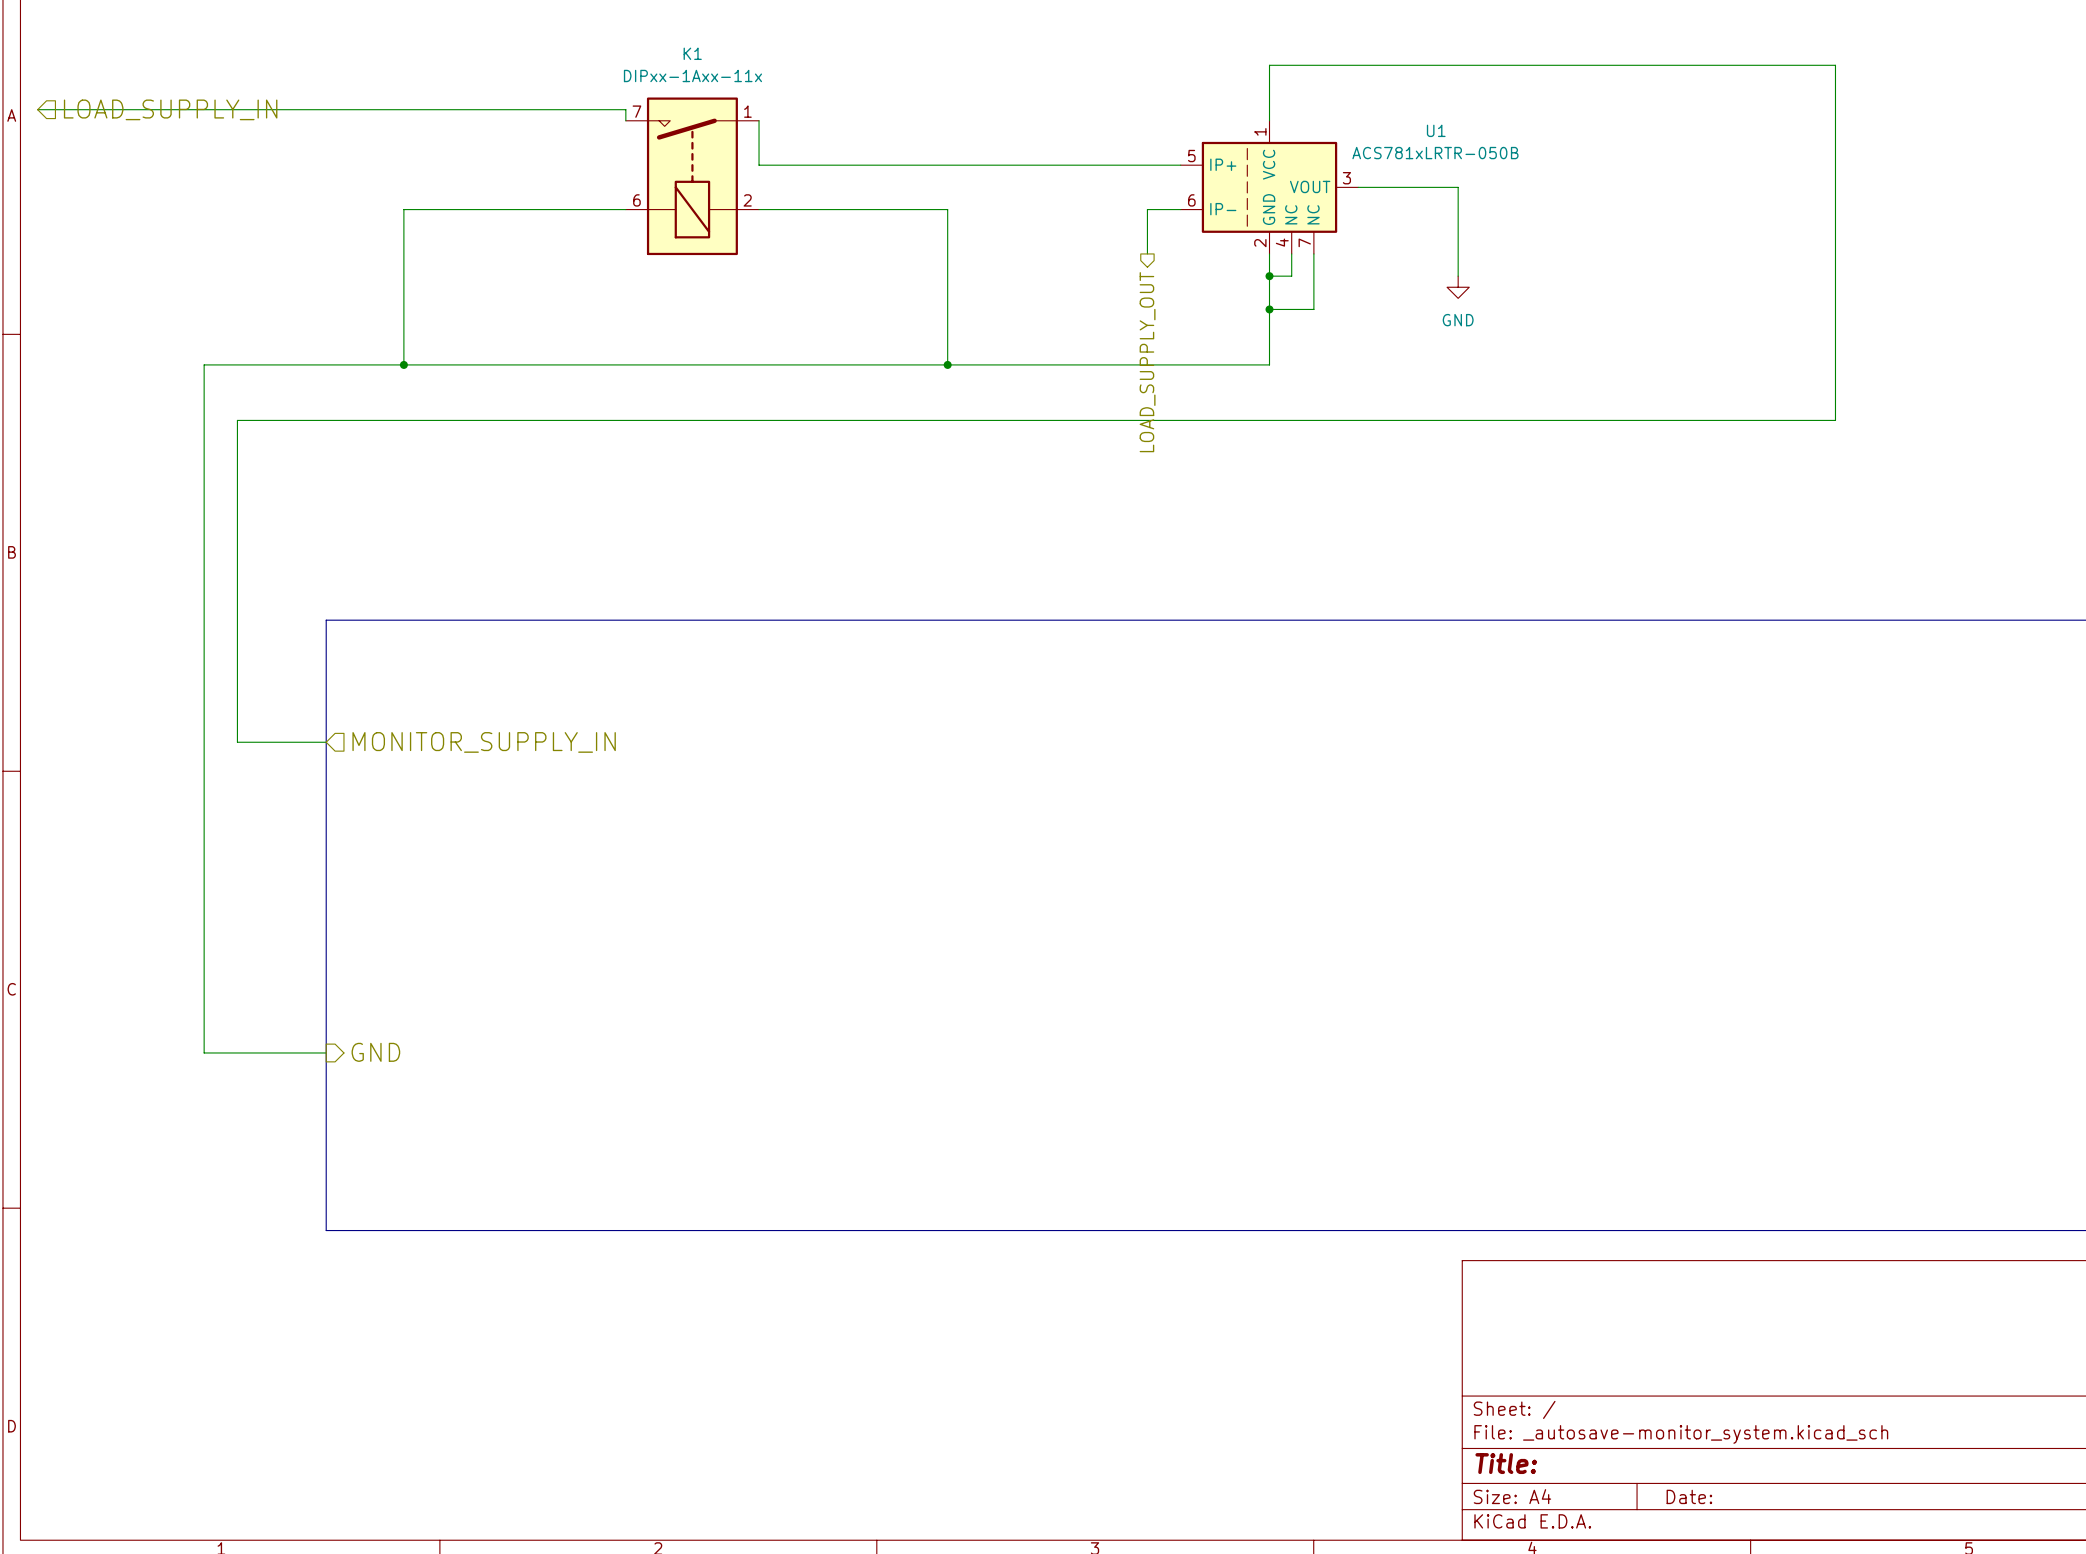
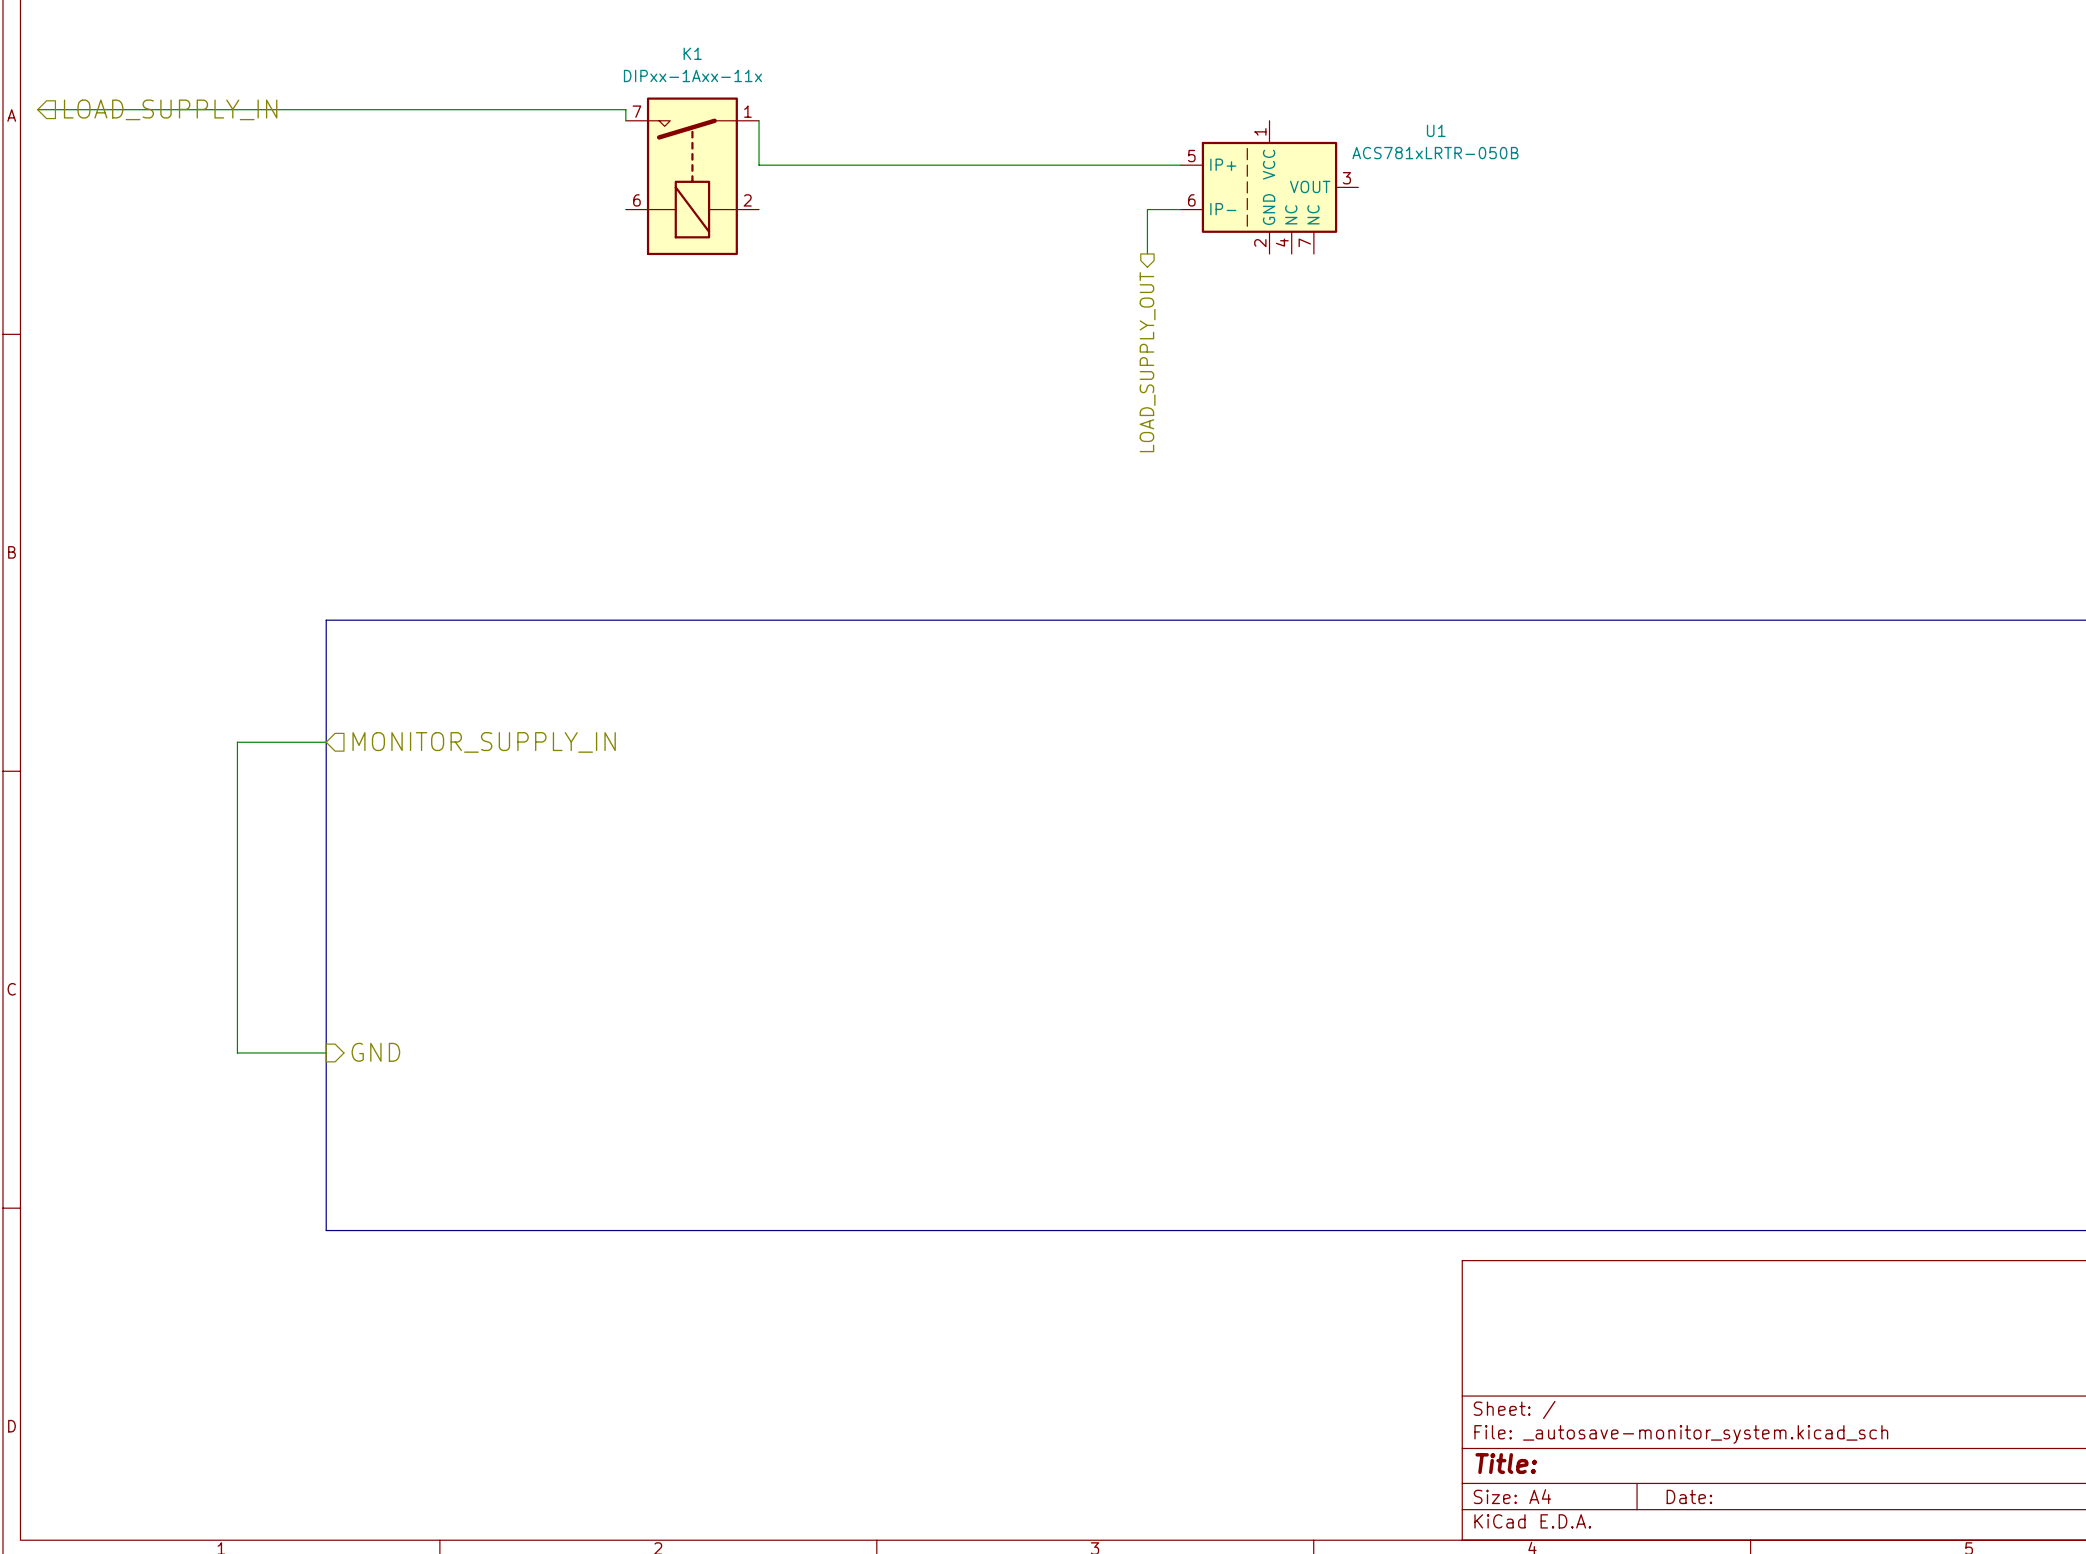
wire: (1269, 120) (1269, 65) (1835, 65) (1835, 420) (237, 420) (237, 742) -> none
wire: (1358, 187) (1458, 187) (1458, 276) -> none
wire: (625, 209) (403, 209) (403, 364) -> none
wire: (759, 209) (947, 209) (947, 364) -> none
wire: (1269, 253) (1269, 364) (204, 364) (204, 1052) (237, 1052) -> (237, 742) (237, 1052)
wire: (1291, 253) (1291, 276) (1269, 276) -> none
wire: (1313, 253) (1313, 309) (1269, 309) -> none
junction: (1269, 276) -> none
power symbol: GND (1458, 287) -> none
junction: (1269, 309) -> none
junction: (403, 364) -> none
junction: (947, 364) -> none

